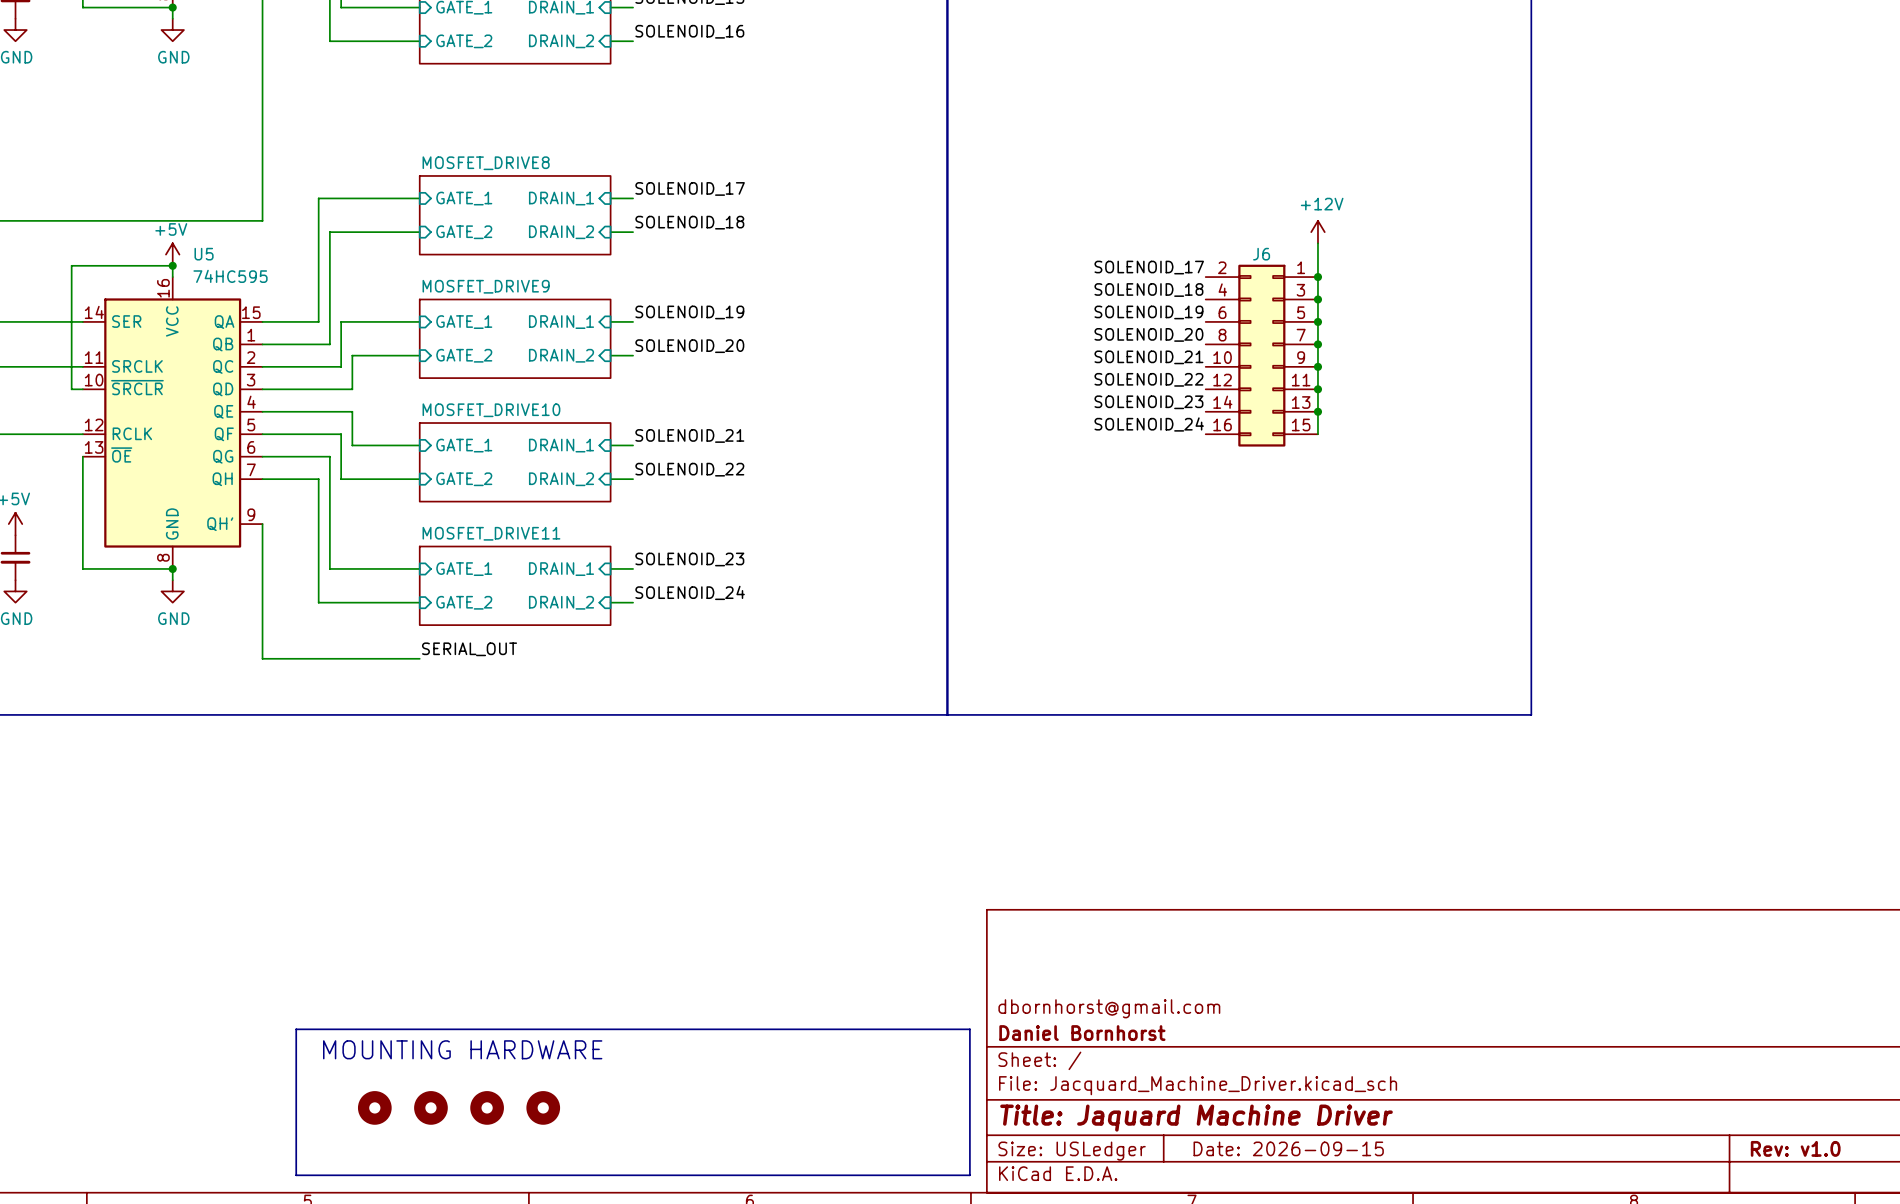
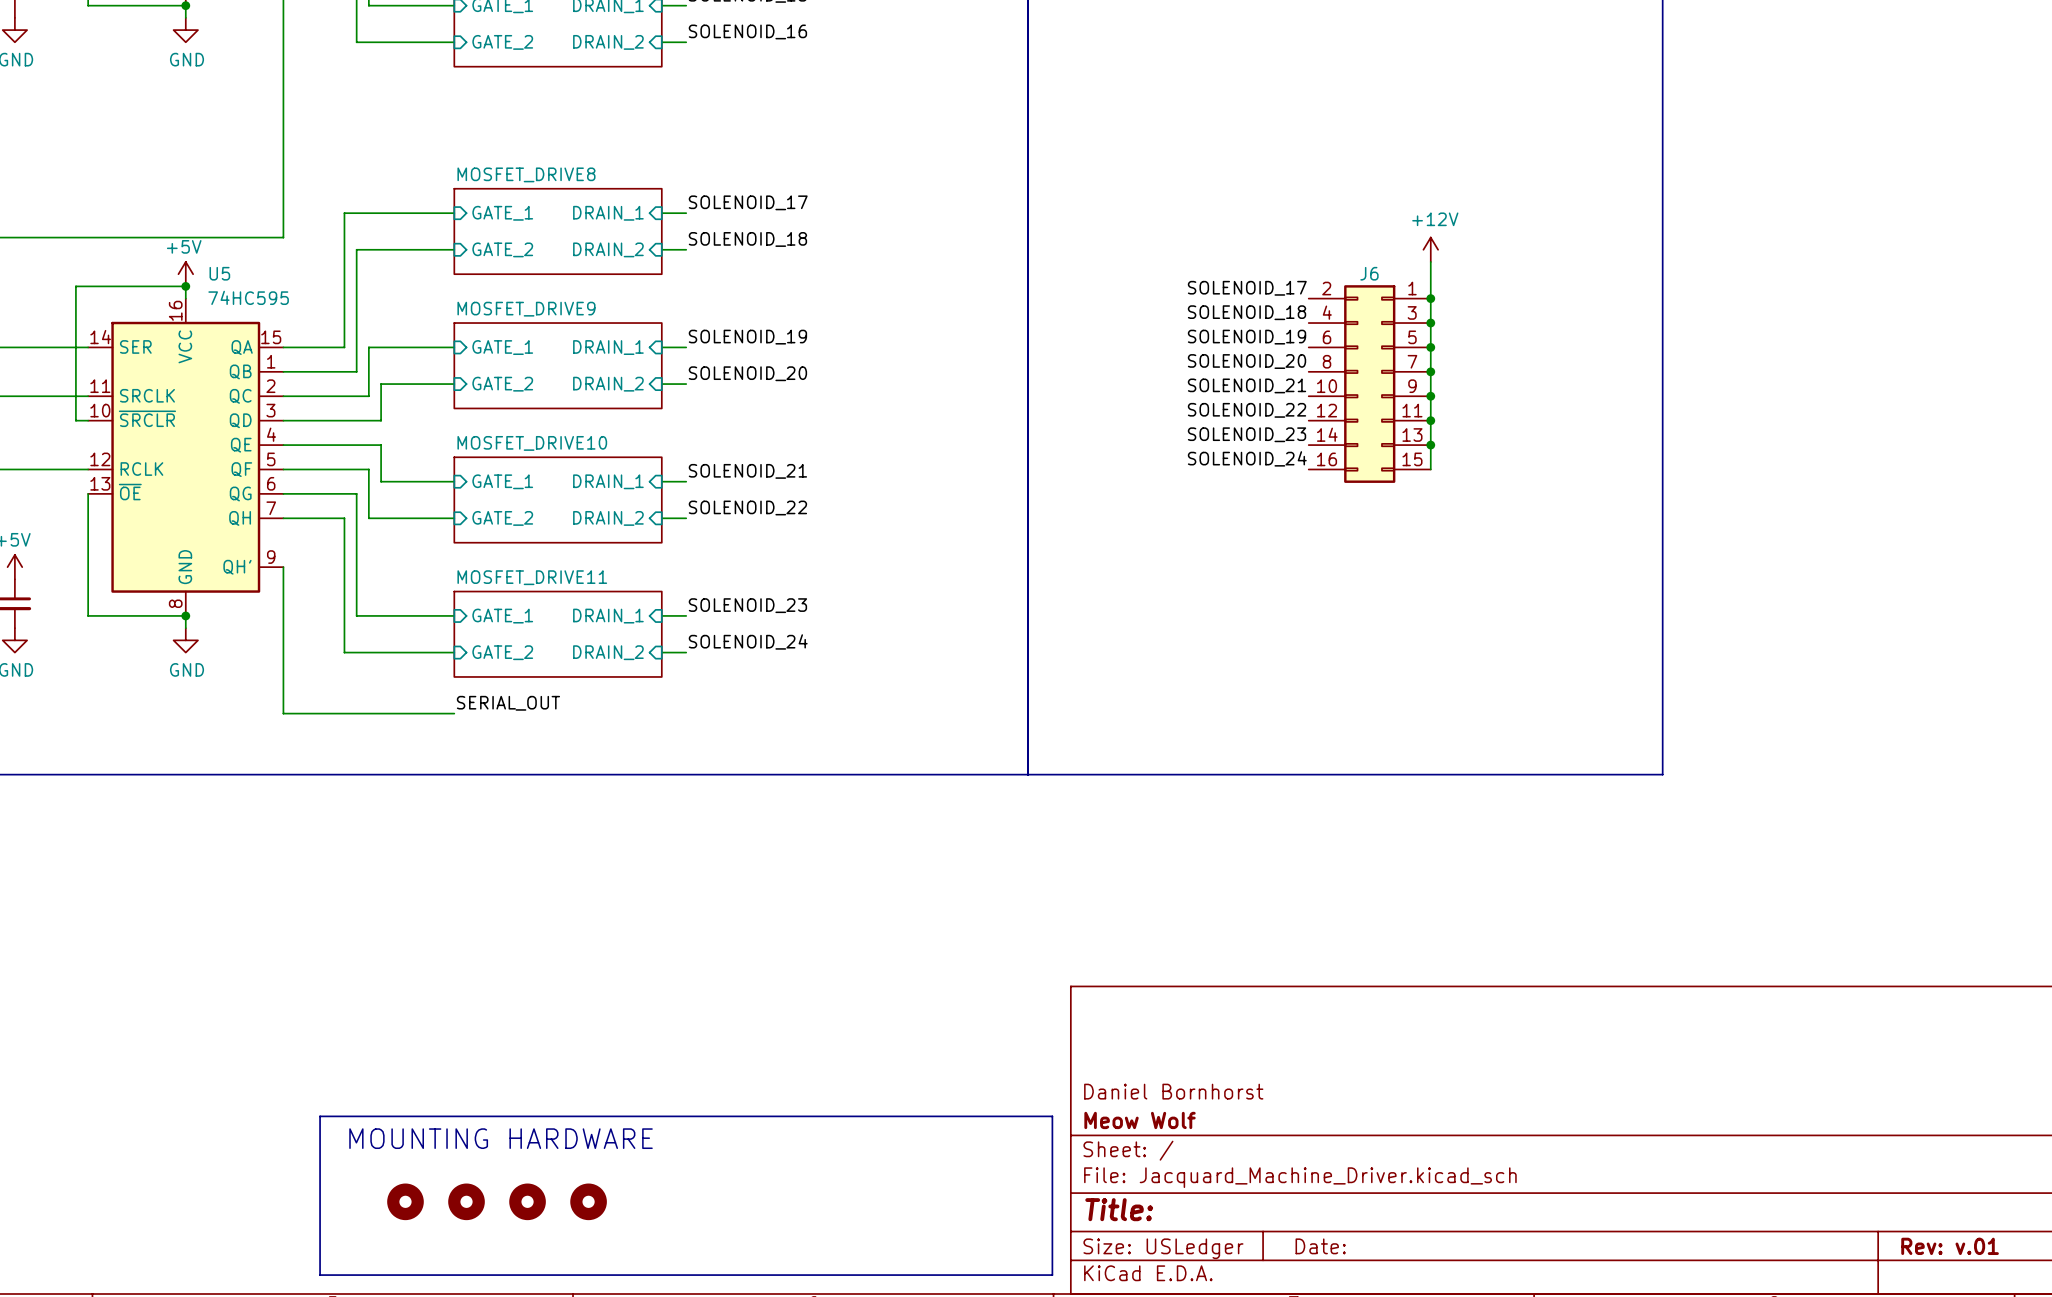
title block: dbornhorst@gmail.com (1109, 1008) -> Daniel Bornhorst (1173, 1091)
title block: Daniel Bornhorst (1082, 1033) -> Meow Wolf (1140, 1120)
title block: Title: Jaquard Machine Driver (1196, 1118) -> Title: (1119, 1209)
title block: Date: 2026-09-15 (1288, 1148) -> Date: (1320, 1246)
title block: Rev: v1.0 (1795, 1148) -> Rev: v.01 (1950, 1246)

